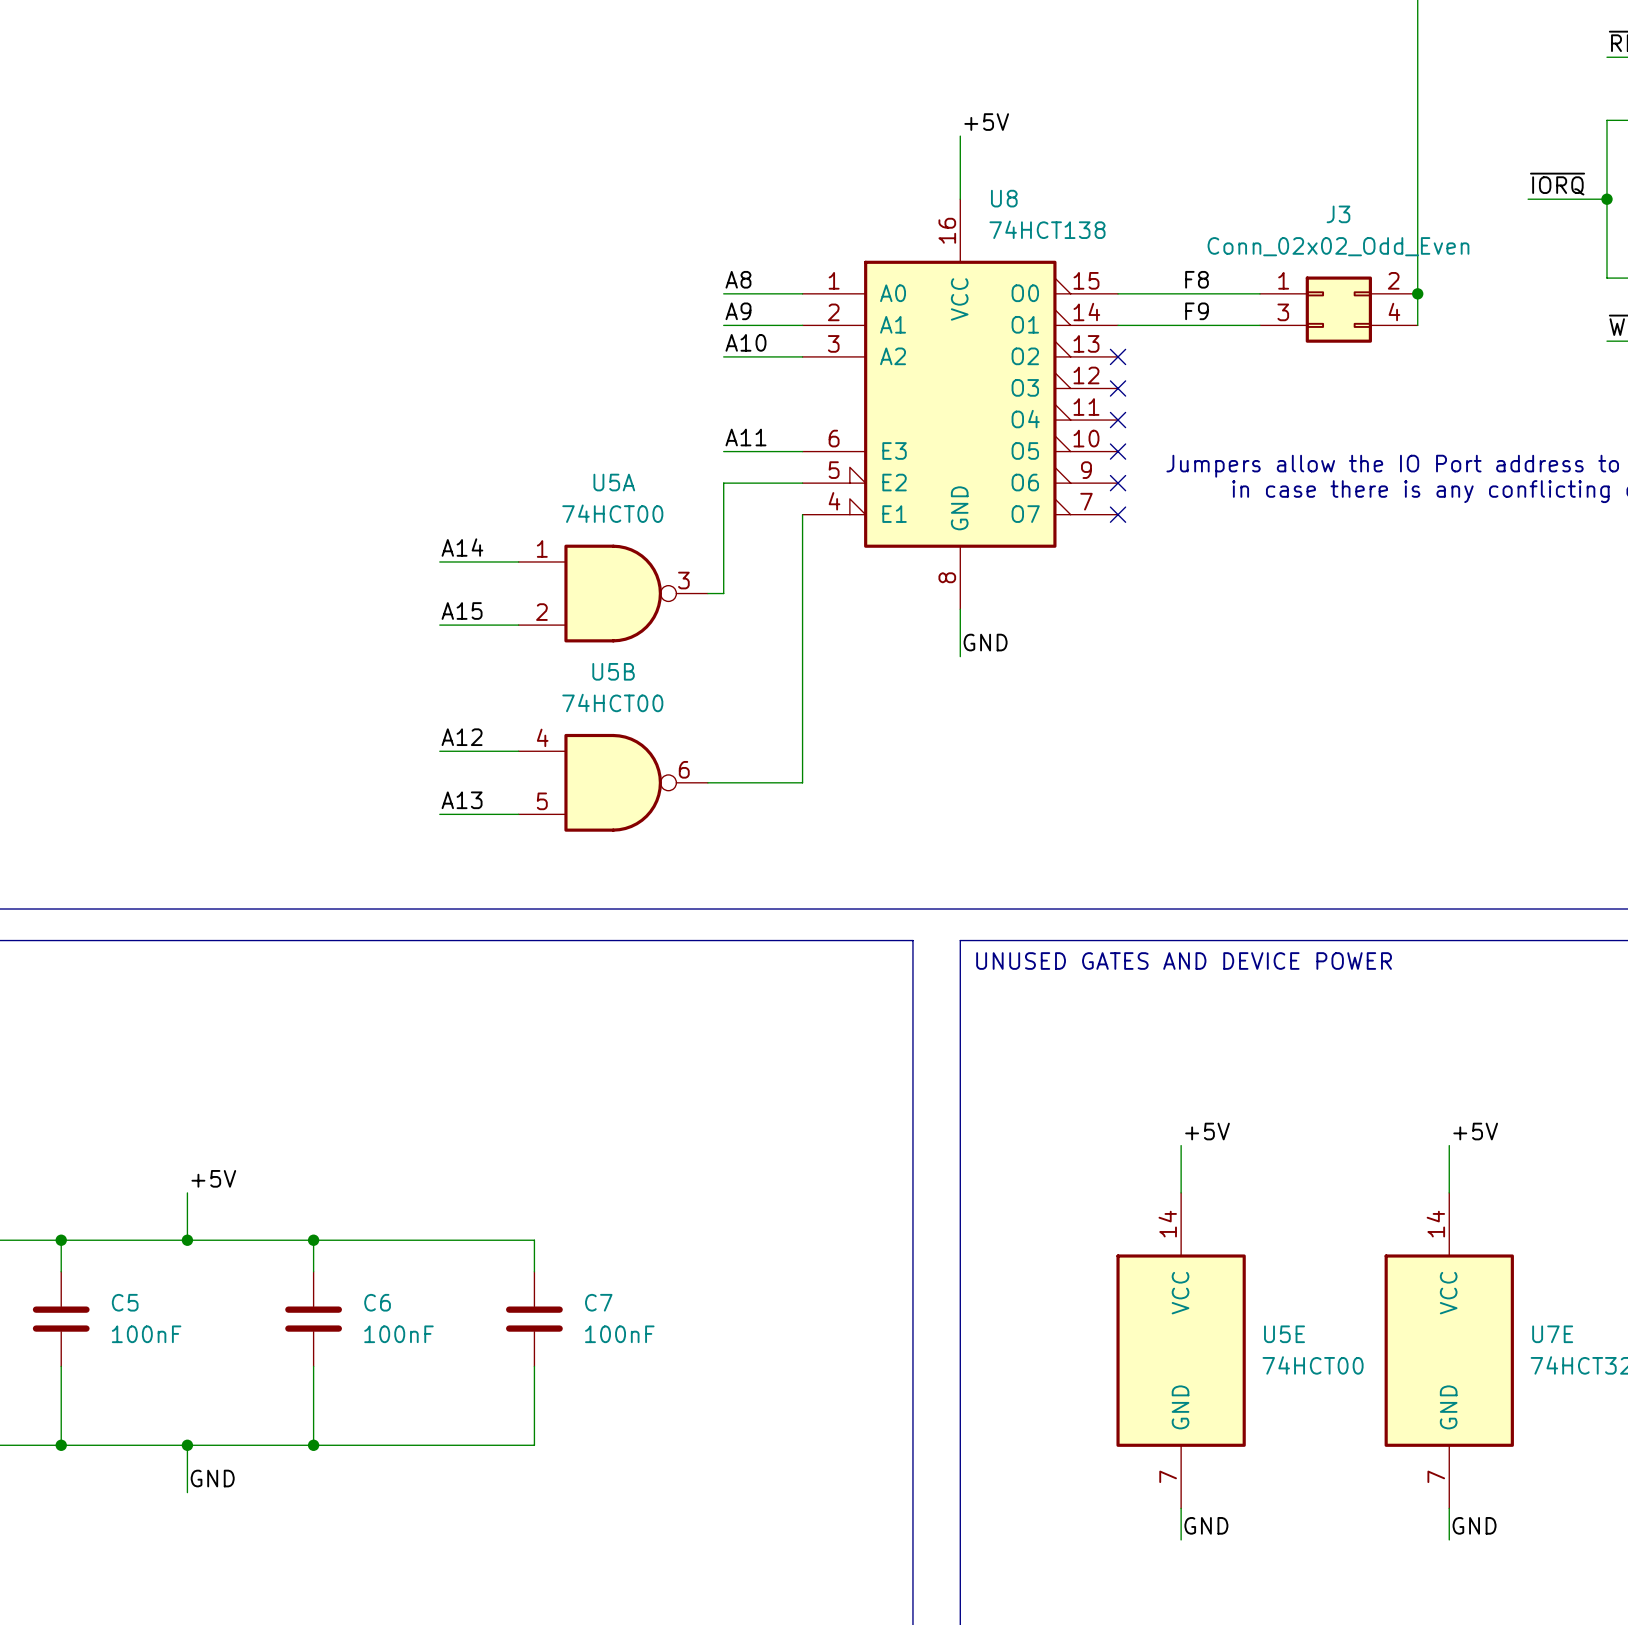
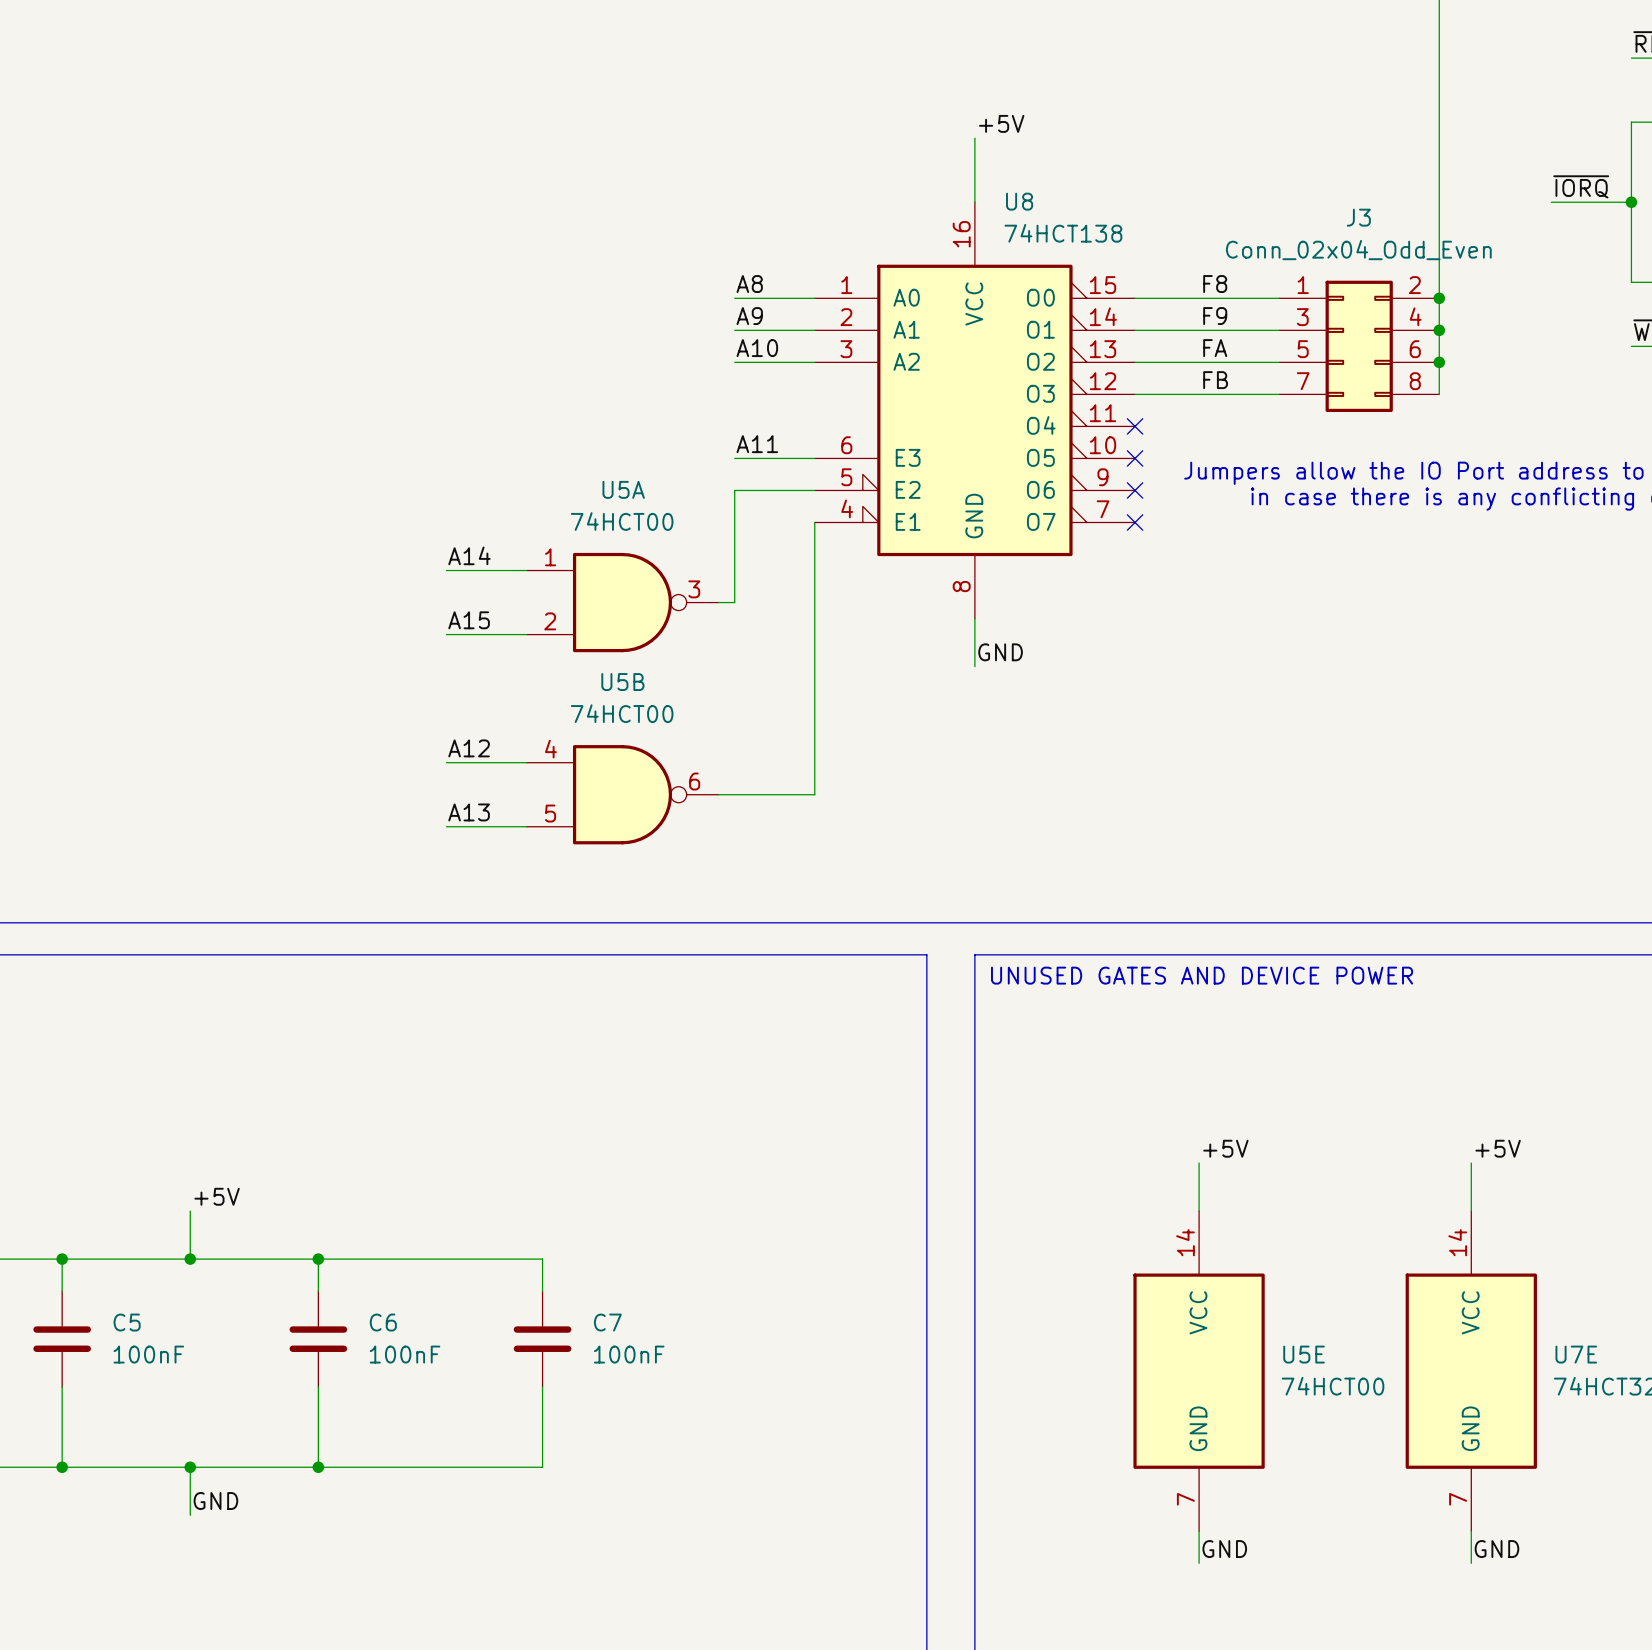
J3 value: Conn_02x02_Odd_Even (1338, 246) -> Conn_02x04_Odd_Even (1358, 250)
J3 symbol: [1259, 276, 1418, 343] -> [1279, 280, 1440, 413]
wire: none -> (1439, 330) (1439, 394)
junction: none -> (1439, 330)
label: none -> FA (1215, 348)
wire: none -> (1135, 362) (1279, 362)
no-connect mark: (1118, 356) -> none
junction: none -> (1439, 362)
label: none -> FB (1215, 380)
wire: none -> (1135, 394) (1279, 394)
no-connect mark: (1118, 388) -> none

